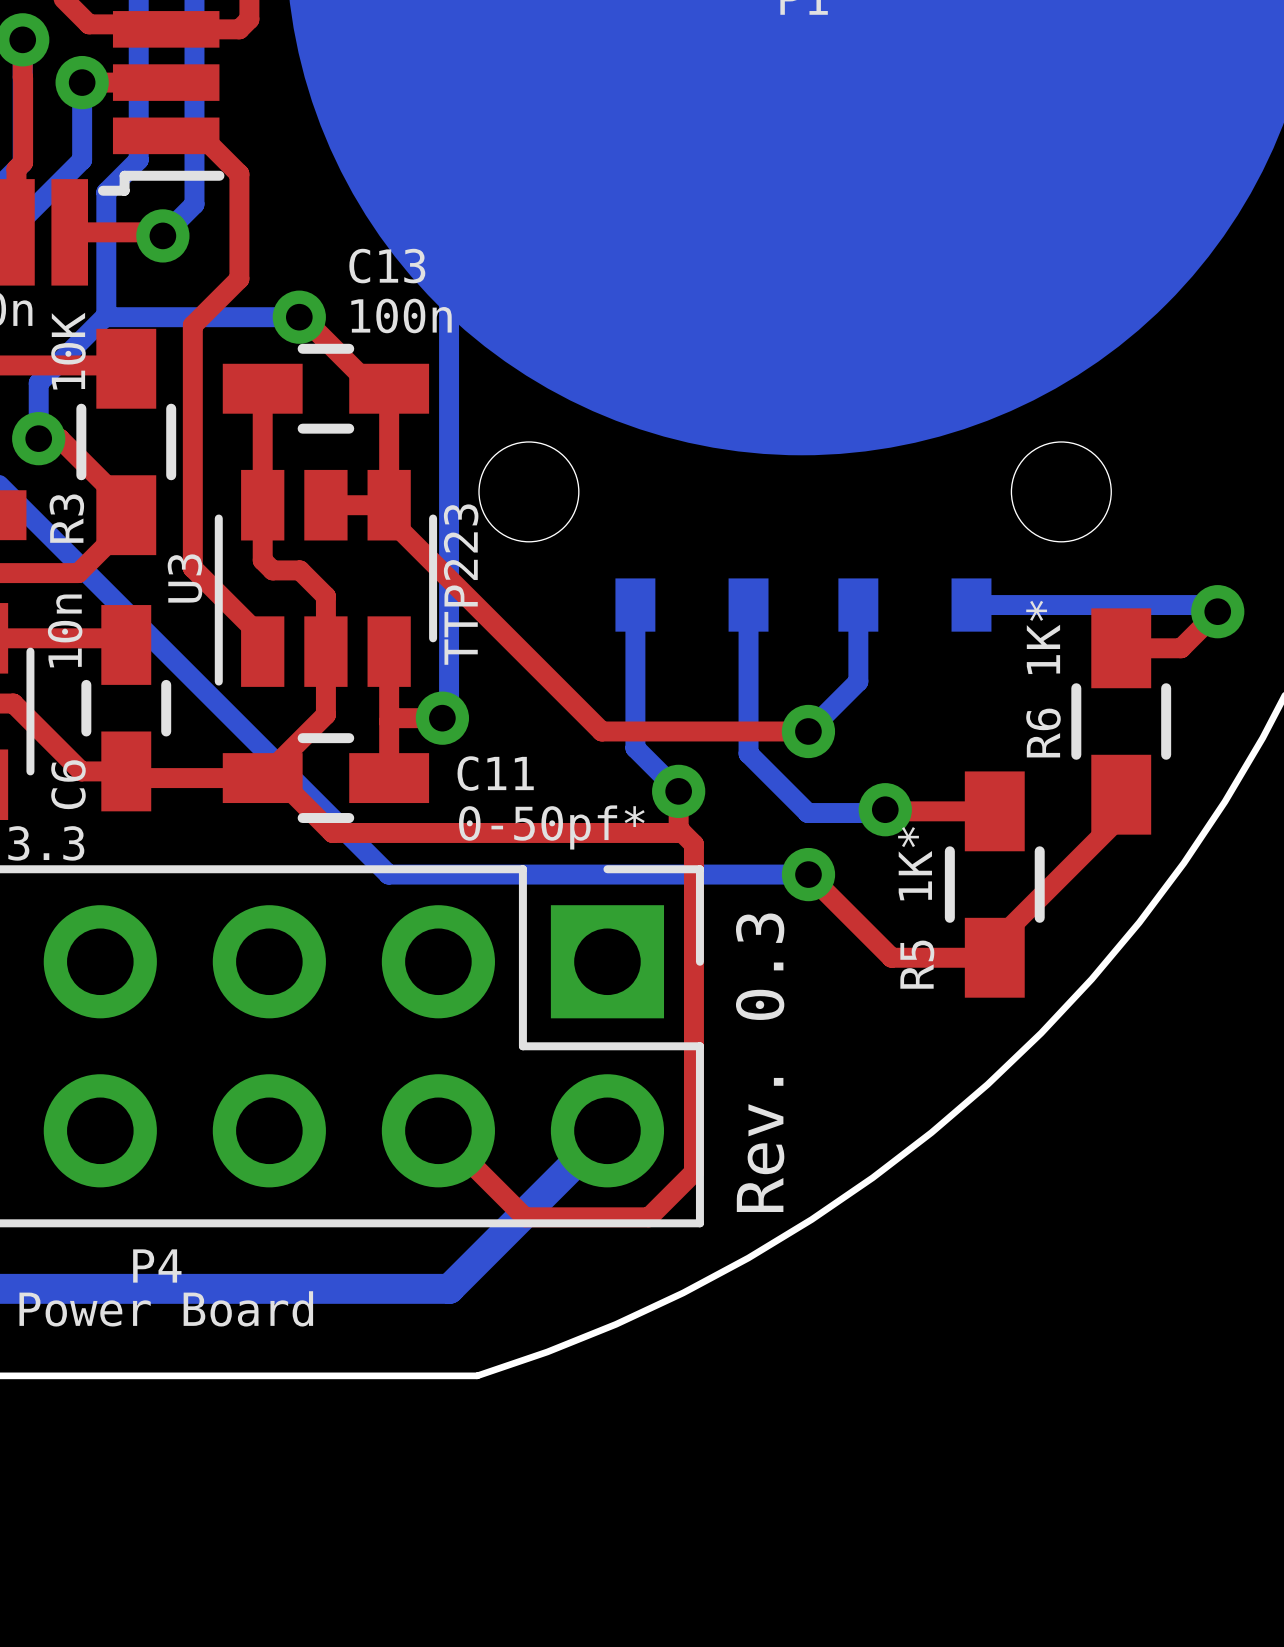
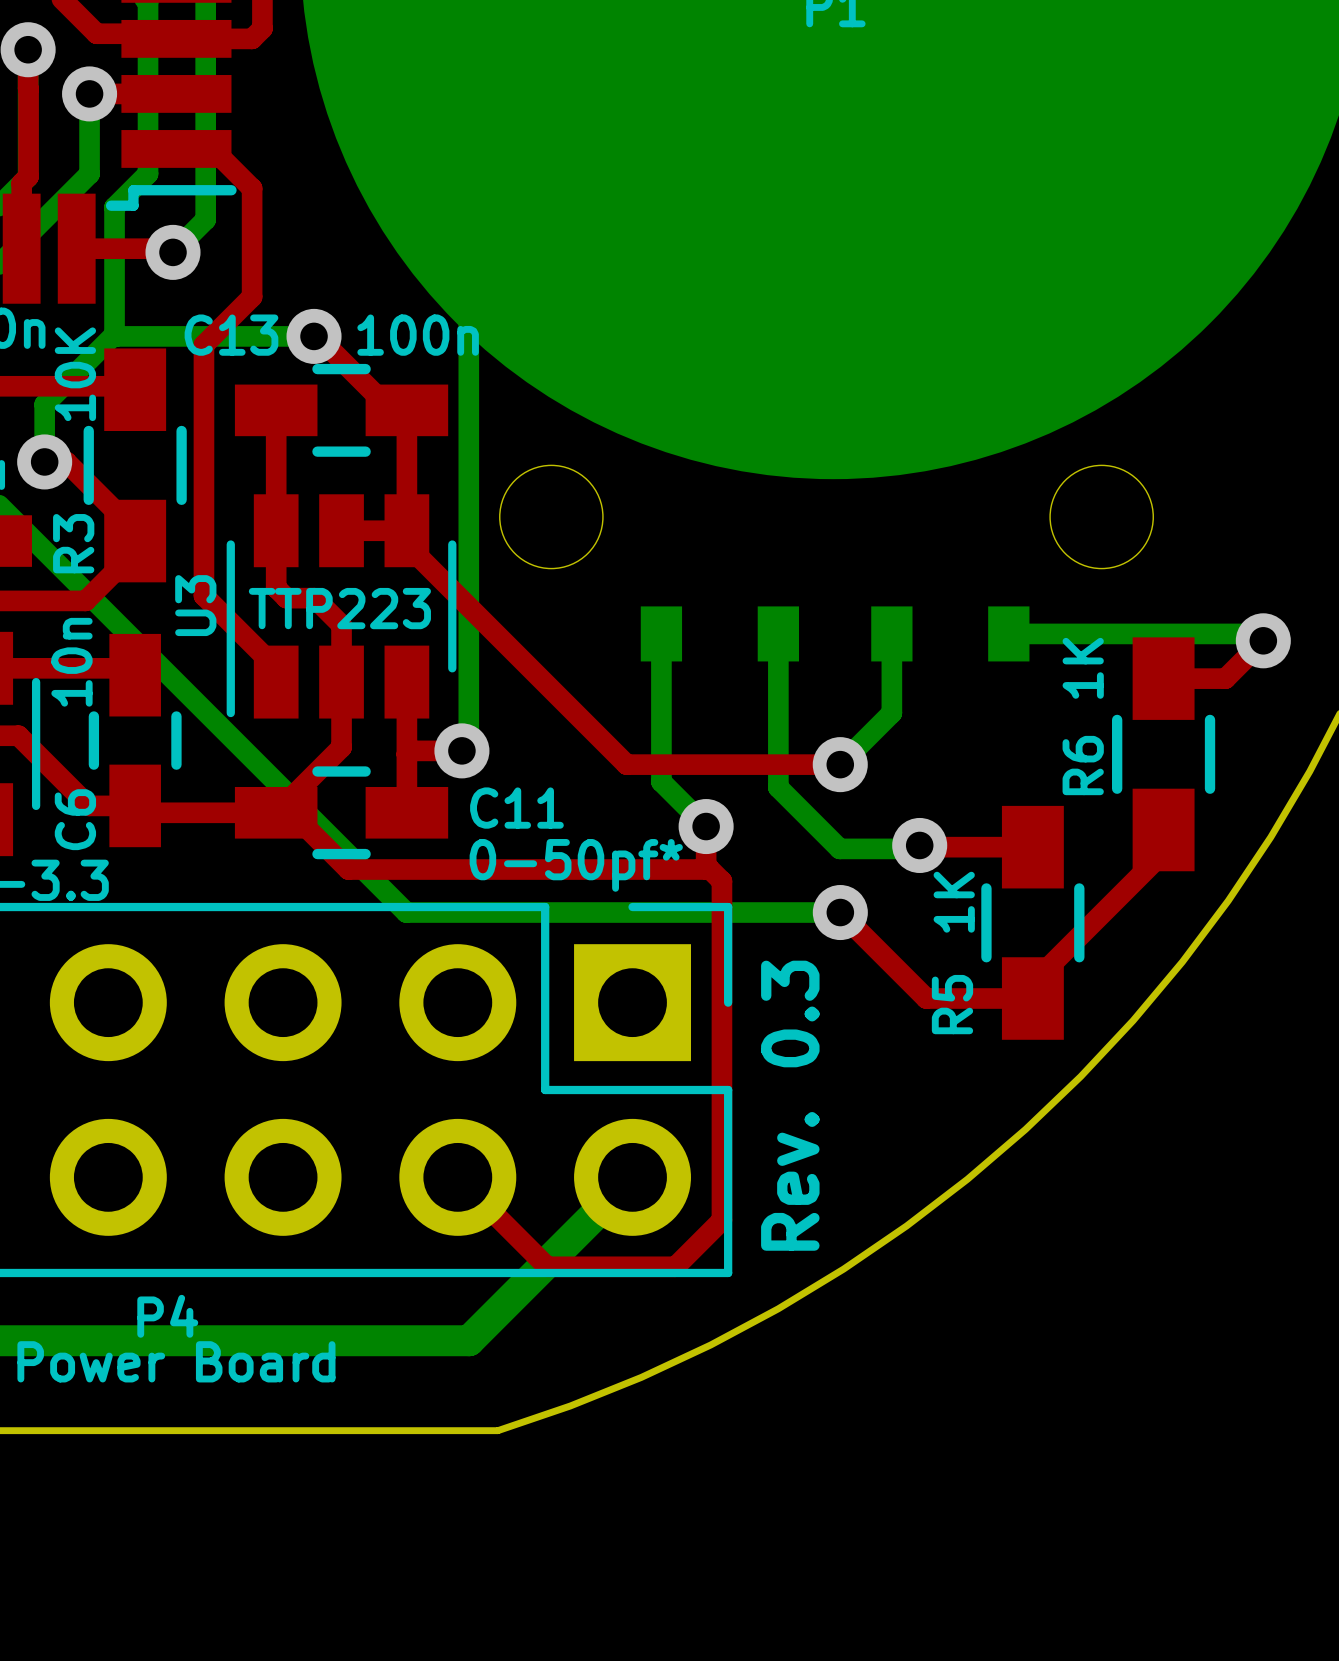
C13 name position: C13 (387, 266) -> C13 (231, 335)
U3 value rotation: 0° (461, 584) -> 90° clockwise (339, 608)
R6 value: 1K* (1043, 637) -> 1K (1083, 668)
R5 value: 1K* (915, 863) -> 1K (954, 902)

